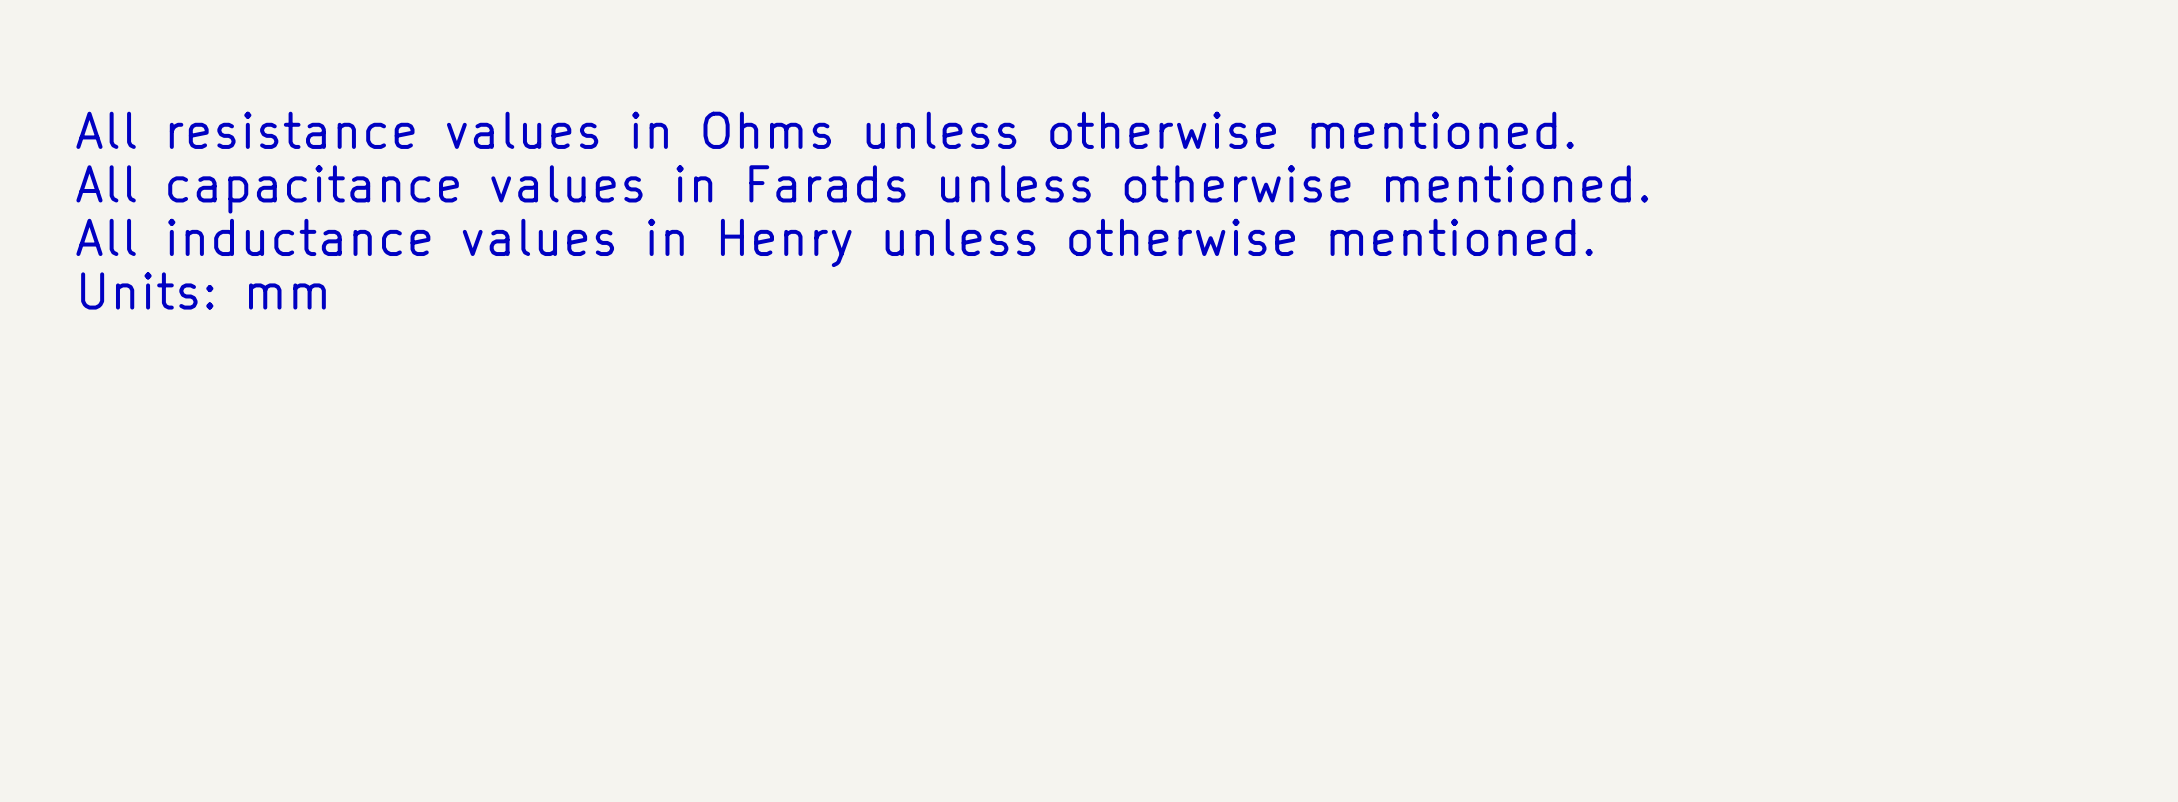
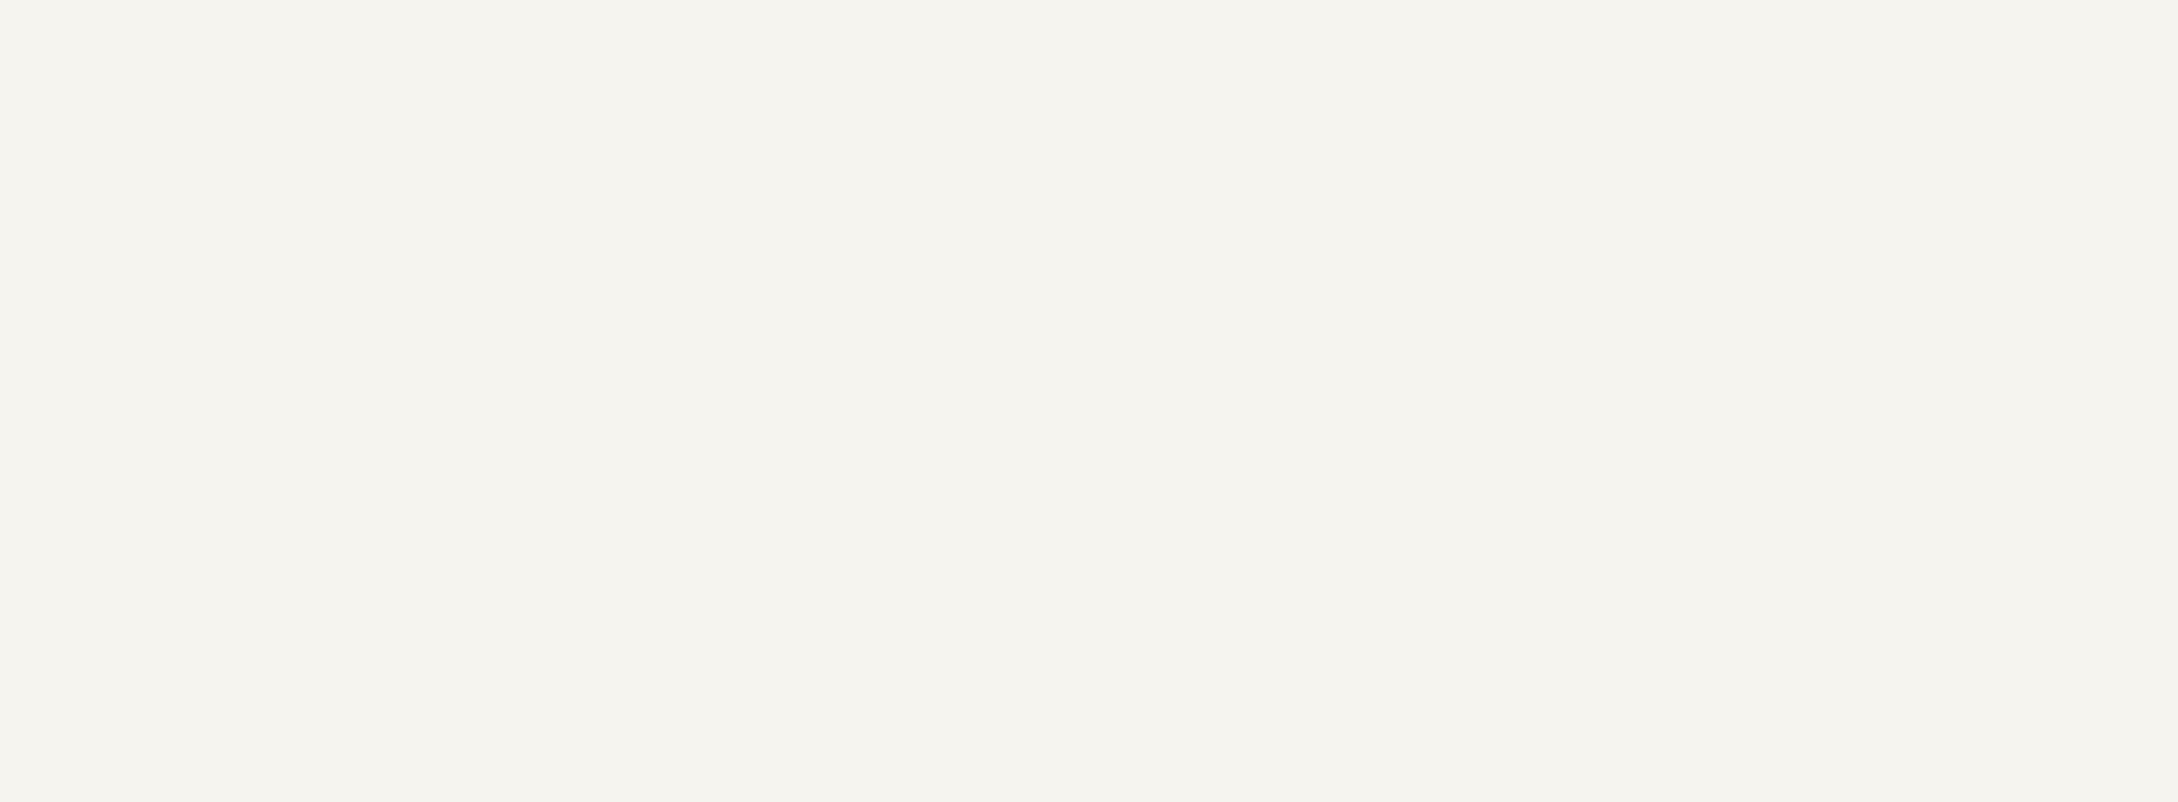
text: All resistance values in Ohms unless otherwise mentioned. (825, 130) -> none
text: All capacitance values in Farads unless otherwise mentioned. (862, 189) -> none
text: All inductance values in Henry unless otherwise mentioned. (834, 242) -> none
text: Units: mm (203, 290) -> none

